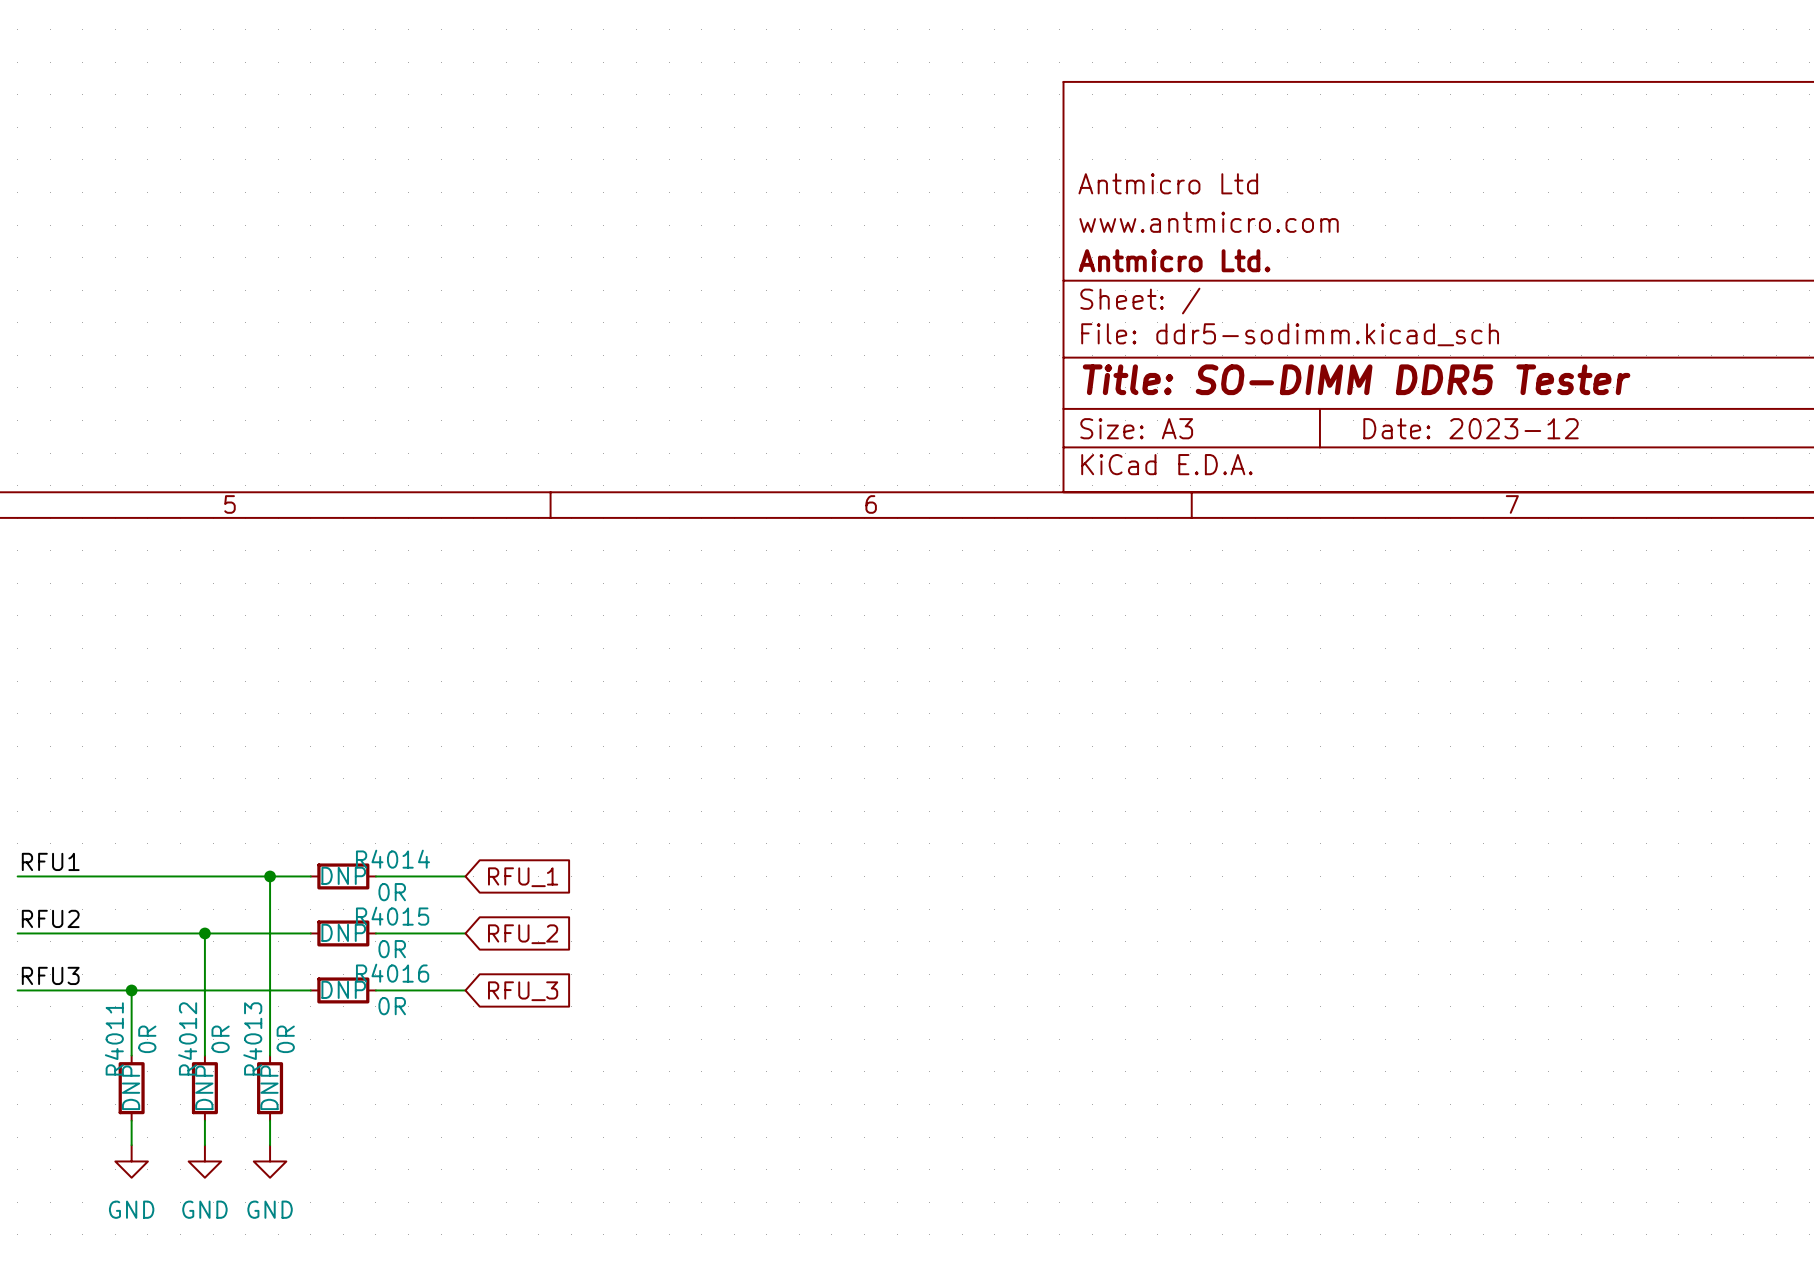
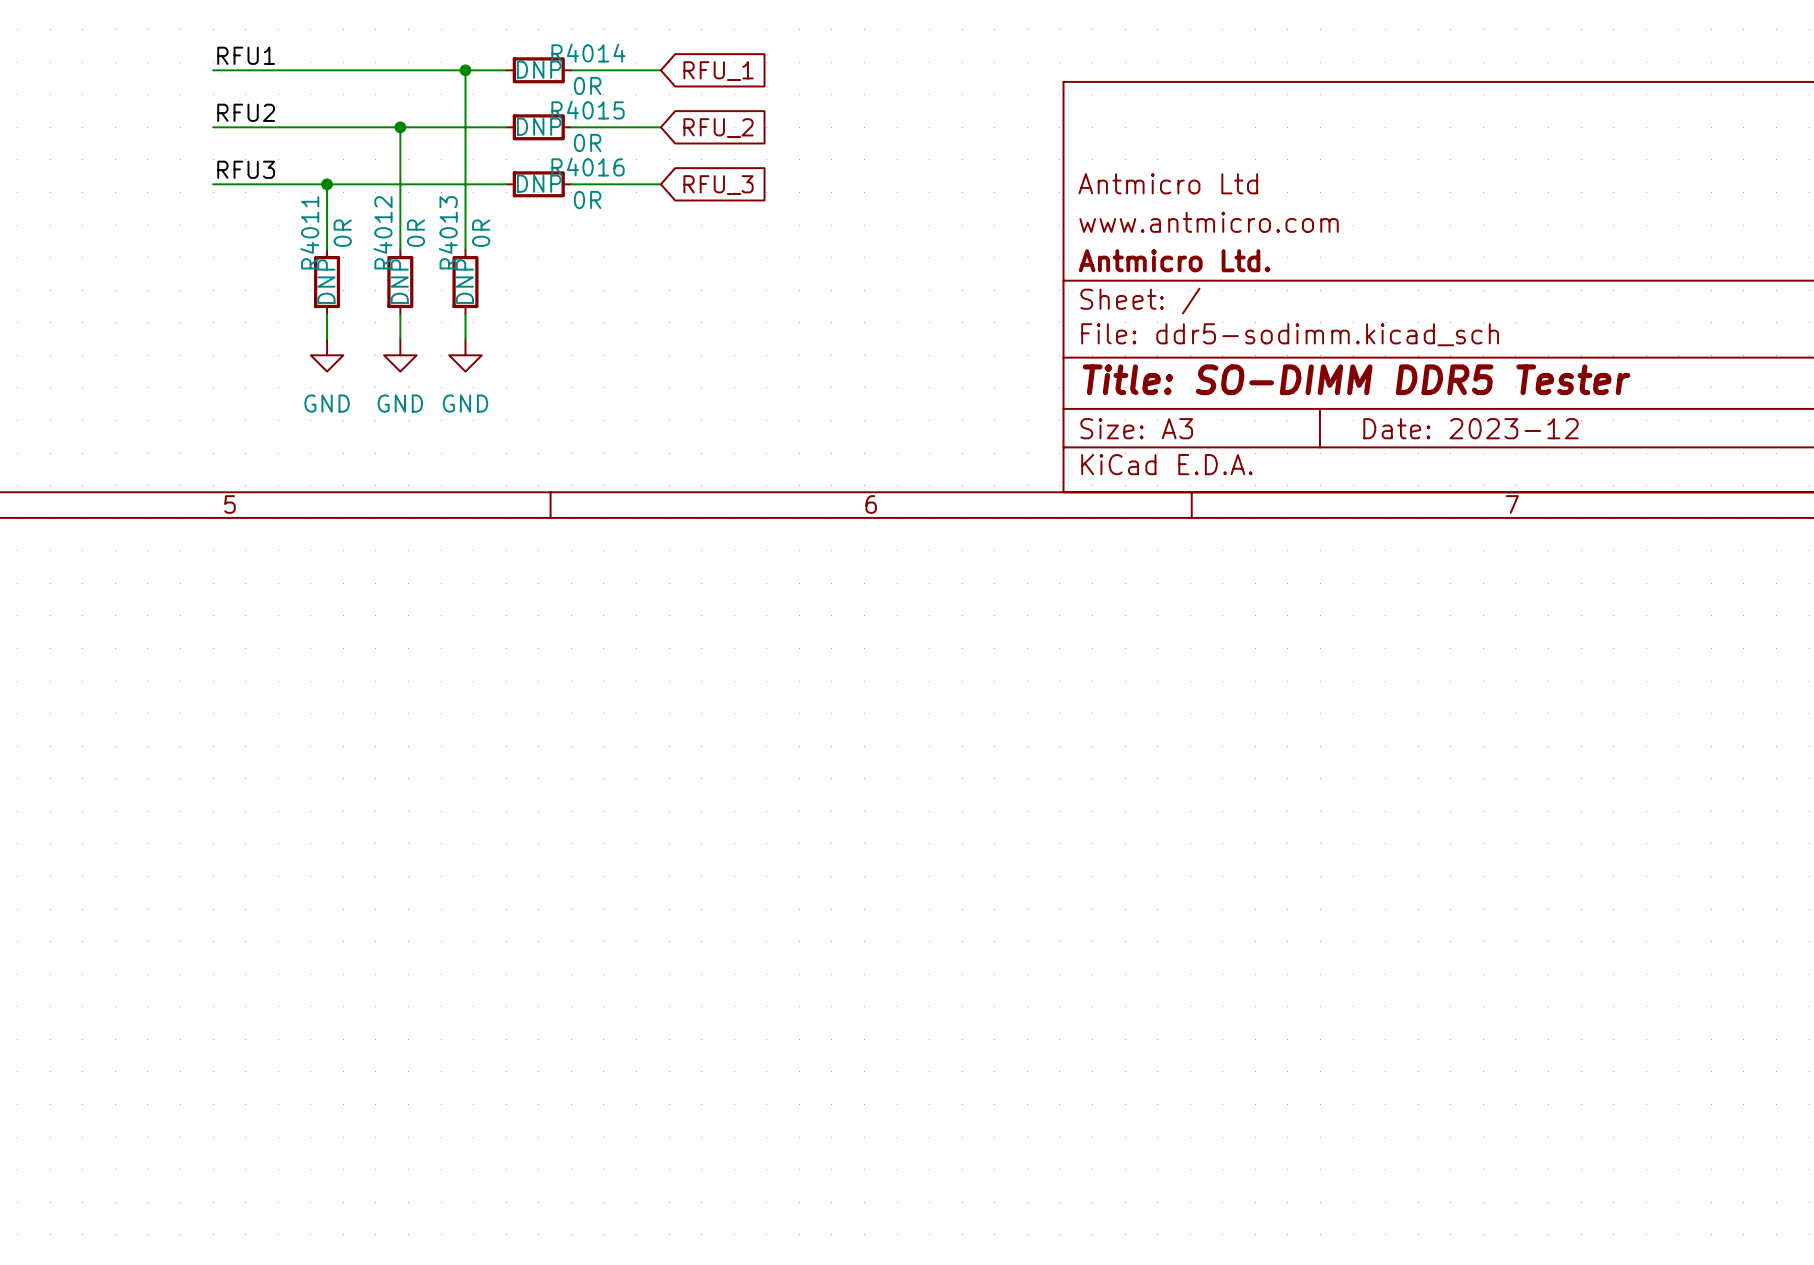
label: none -> RFU1 (246, 55)
wire: none -> (213, 70) (506, 70)
wire: none -> (465, 70) (465, 249)
junction: none -> (465, 70)
wire: none -> (571, 70) (660, 70)
global label: none -> RFU_1 (718, 71)
label: none -> RFU2 (246, 112)
wire: none -> (213, 127) (506, 127)
wire: none -> (400, 127) (400, 249)
junction: none -> (400, 127)
wire: none -> (571, 127) (660, 127)
global label: none -> RFU_2 (718, 128)
label: none -> RFU3 (246, 169)
wire: none -> (213, 184) (506, 184)
wire: none -> (327, 184) (327, 249)
junction: none -> (327, 184)
wire: none -> (571, 184) (660, 184)
global label: none -> RFU_3 (718, 185)
wire: none -> (327, 314) (327, 339)
wire: none -> (400, 314) (400, 339)
wire: none -> (465, 314) (465, 339)
power symbol: none -> GND (327, 355)
power symbol: none -> GND (400, 355)
power symbol: none -> GND (465, 355)
label: RFU1 (50, 861) -> none
wire: (17, 876) (310, 876) -> none
wire: (270, 876) (270, 1055) -> none
junction: (270, 876) -> none
R4014 position: (343, 876) -> (538, 70)
wire: (375, 876) (465, 876) -> none
global label: RFU_1 (523, 877) -> none
label: RFU2 (50, 918) -> none
wire: (17, 933) (310, 933) -> none
wire: (204, 933) (204, 1055) -> none
junction: (204, 933) -> none
R4015 position: (343, 933) -> (538, 127)
wire: (375, 933) (465, 933) -> none
global label: RFU_2 (523, 934) -> none
label: RFU3 (50, 975) -> none
wire: (17, 990) (310, 990) -> none
wire: (131, 990) (131, 1055) -> none
junction: (131, 990) -> none
R4016 position: (343, 990) -> (538, 184)
wire: (375, 990) (465, 990) -> none
global label: RFU_3 (523, 991) -> none
R4011 position: (131, 1088) -> (327, 282)
R4012 position: (204, 1088) -> (400, 282)
R4013 position: (270, 1088) -> (465, 282)
wire: (131, 1120) (131, 1145) -> none
wire: (204, 1120) (204, 1145) -> none
wire: (270, 1120) (270, 1145) -> none
power symbol: GND (131, 1161) -> none
power symbol: GND (204, 1161) -> none
power symbol: GND (270, 1161) -> none

